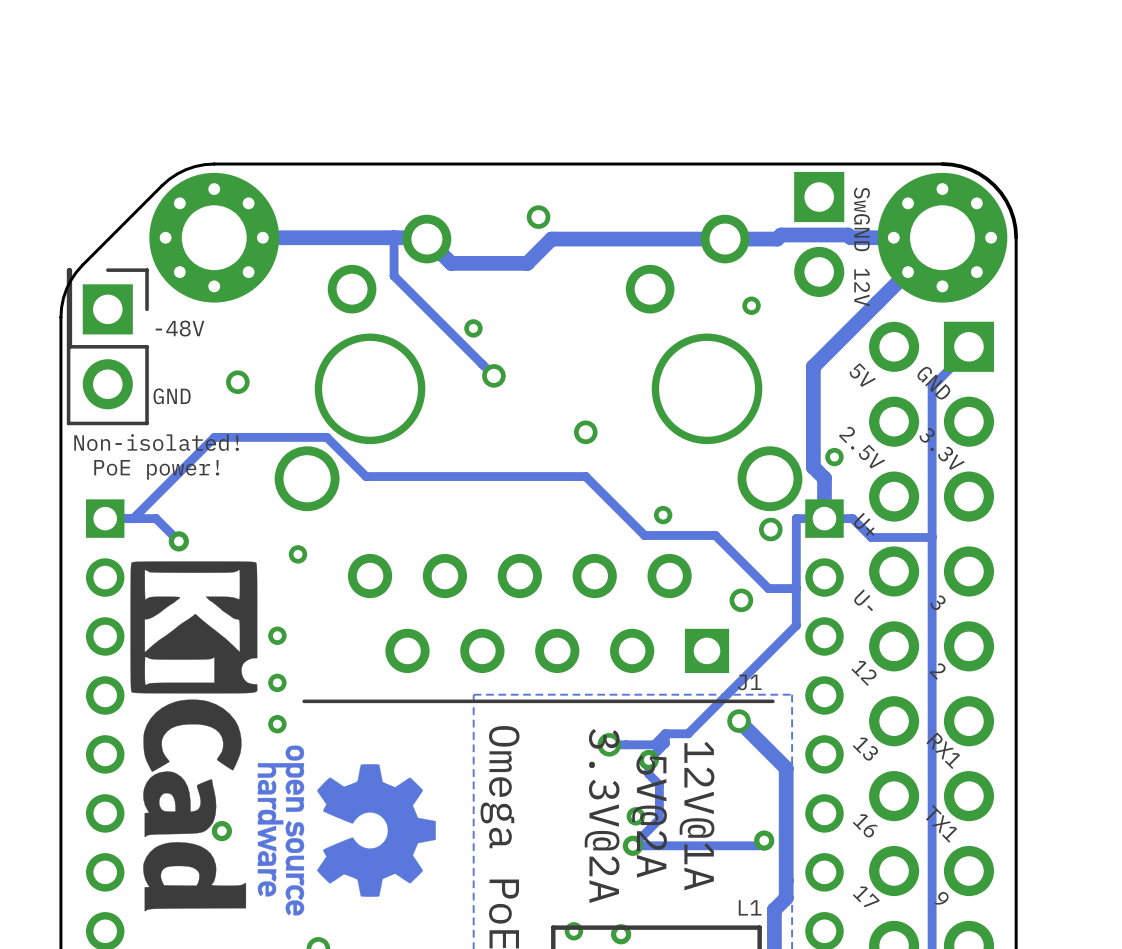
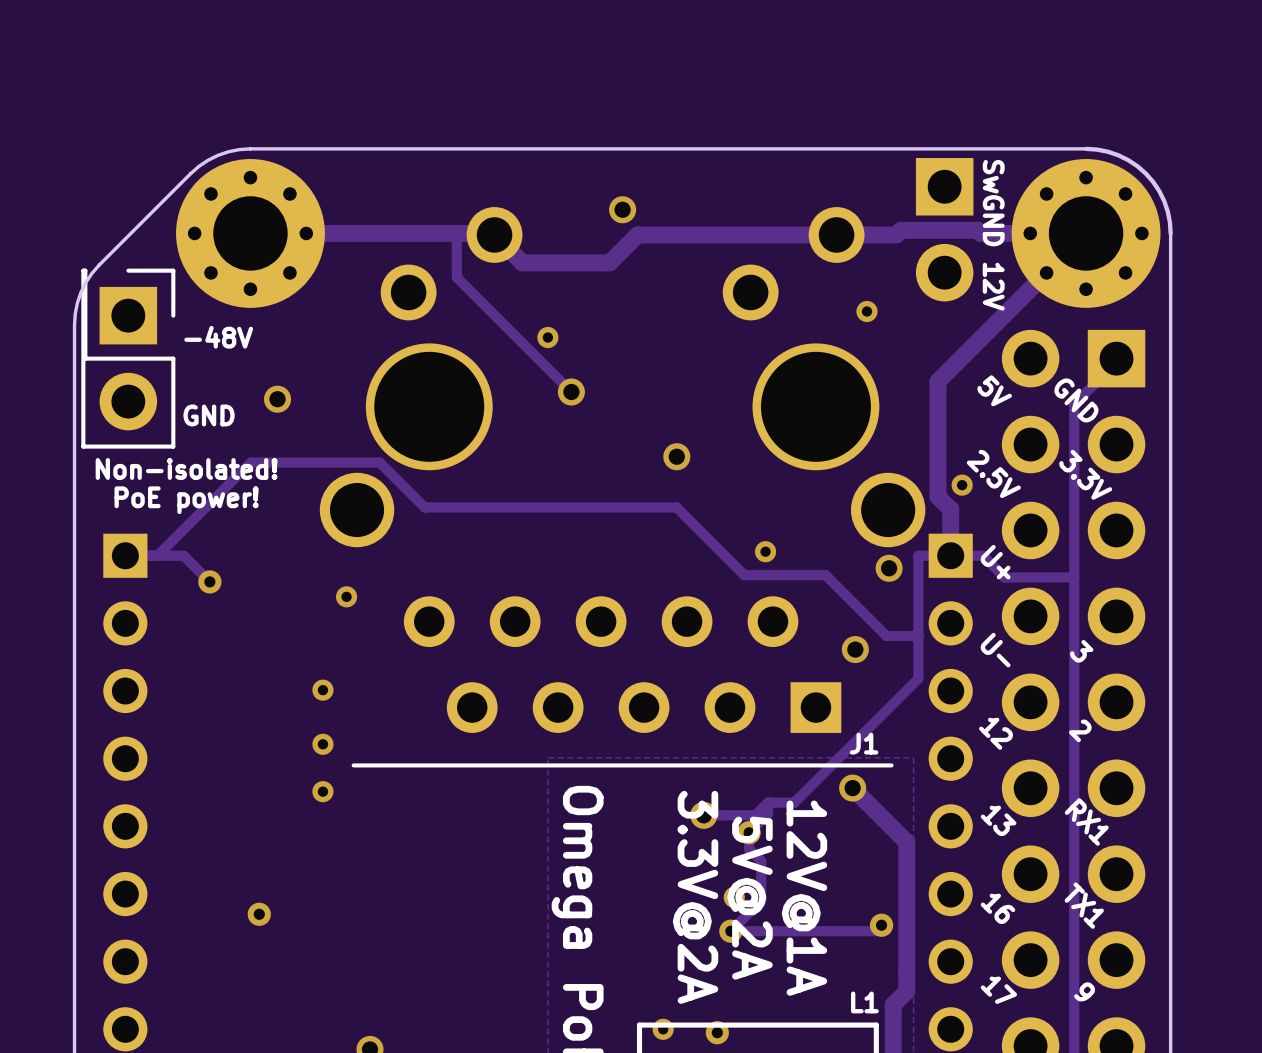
drawing: [130, 561, 436, 916] -> none

